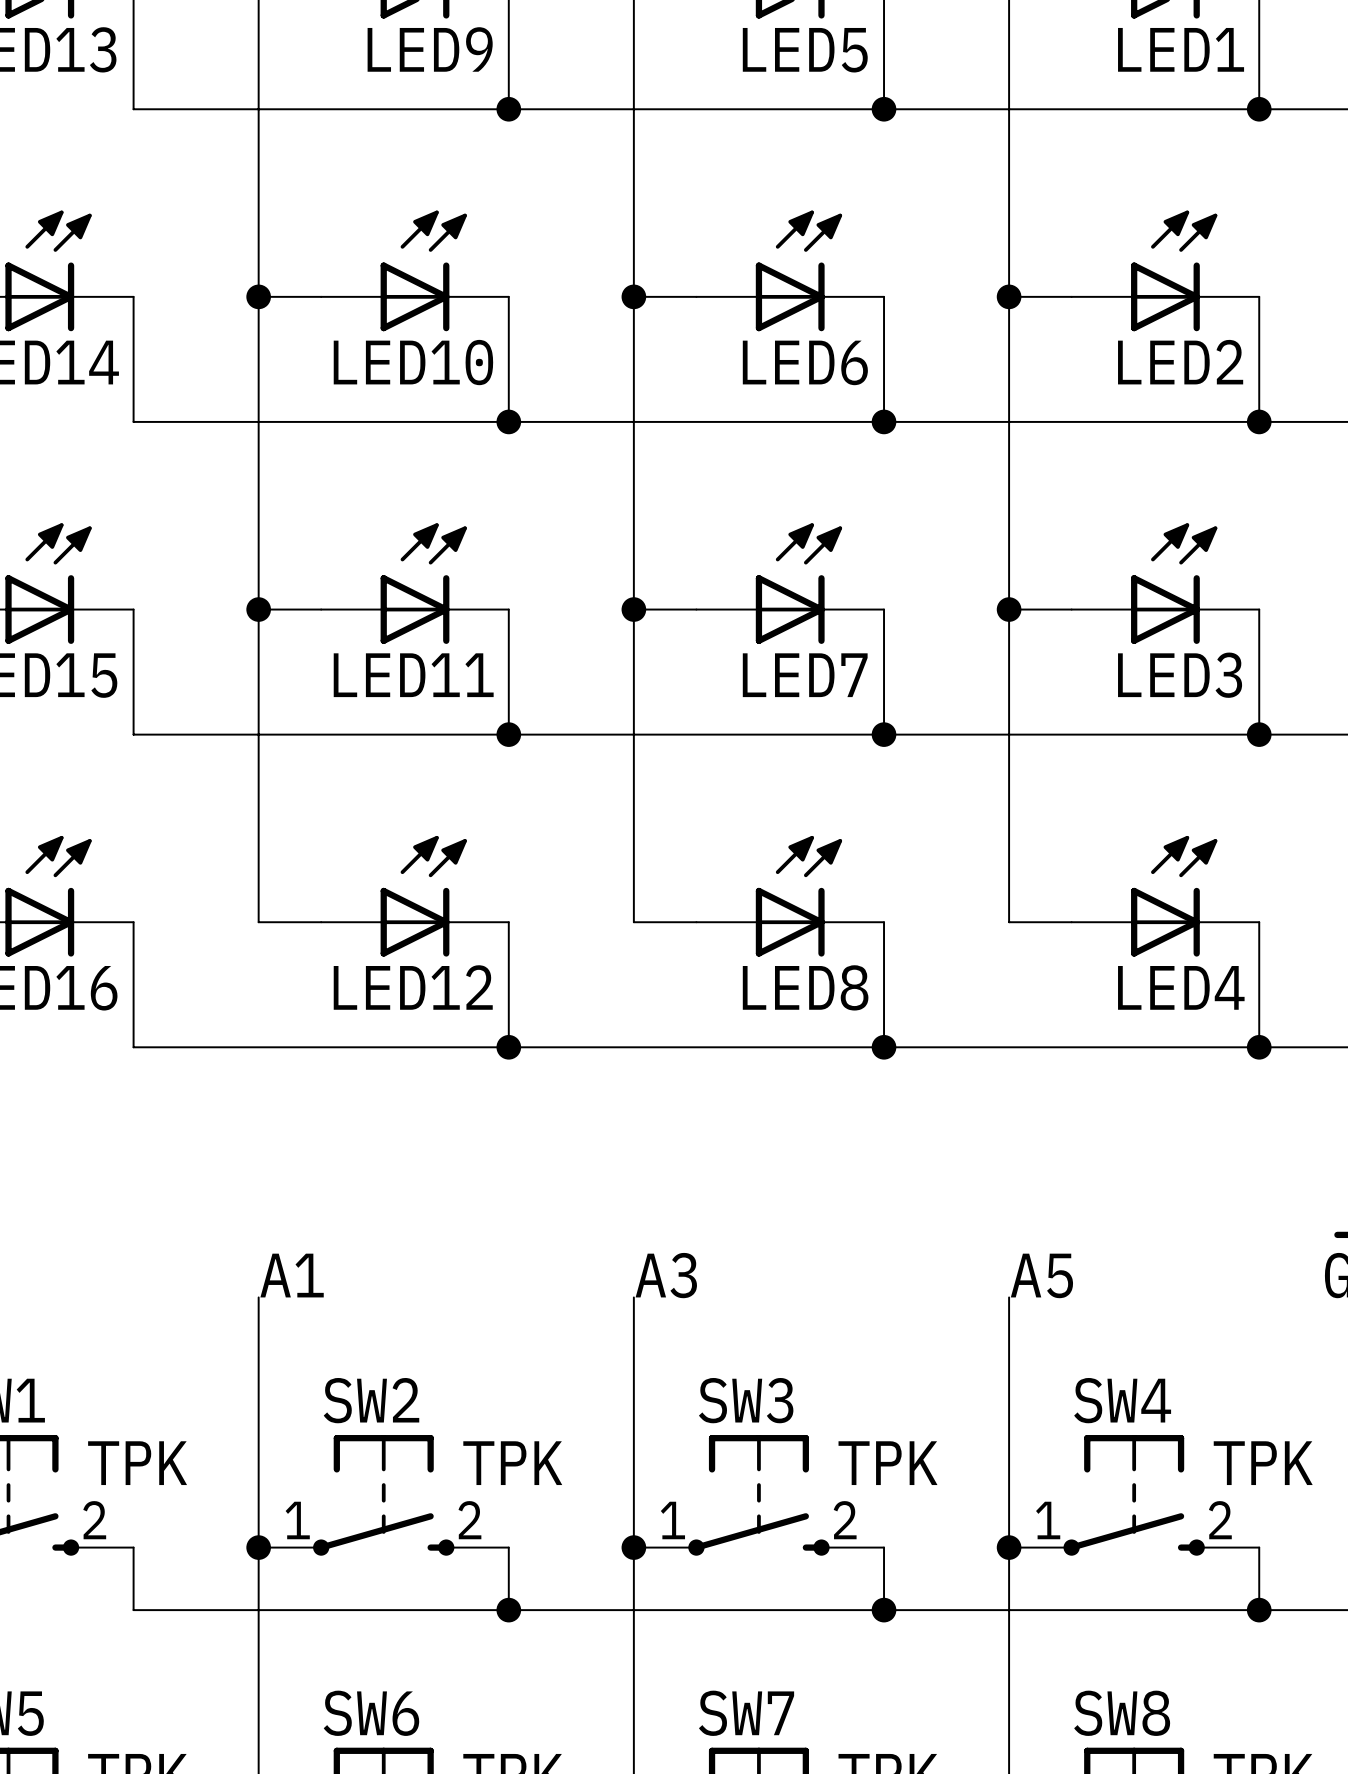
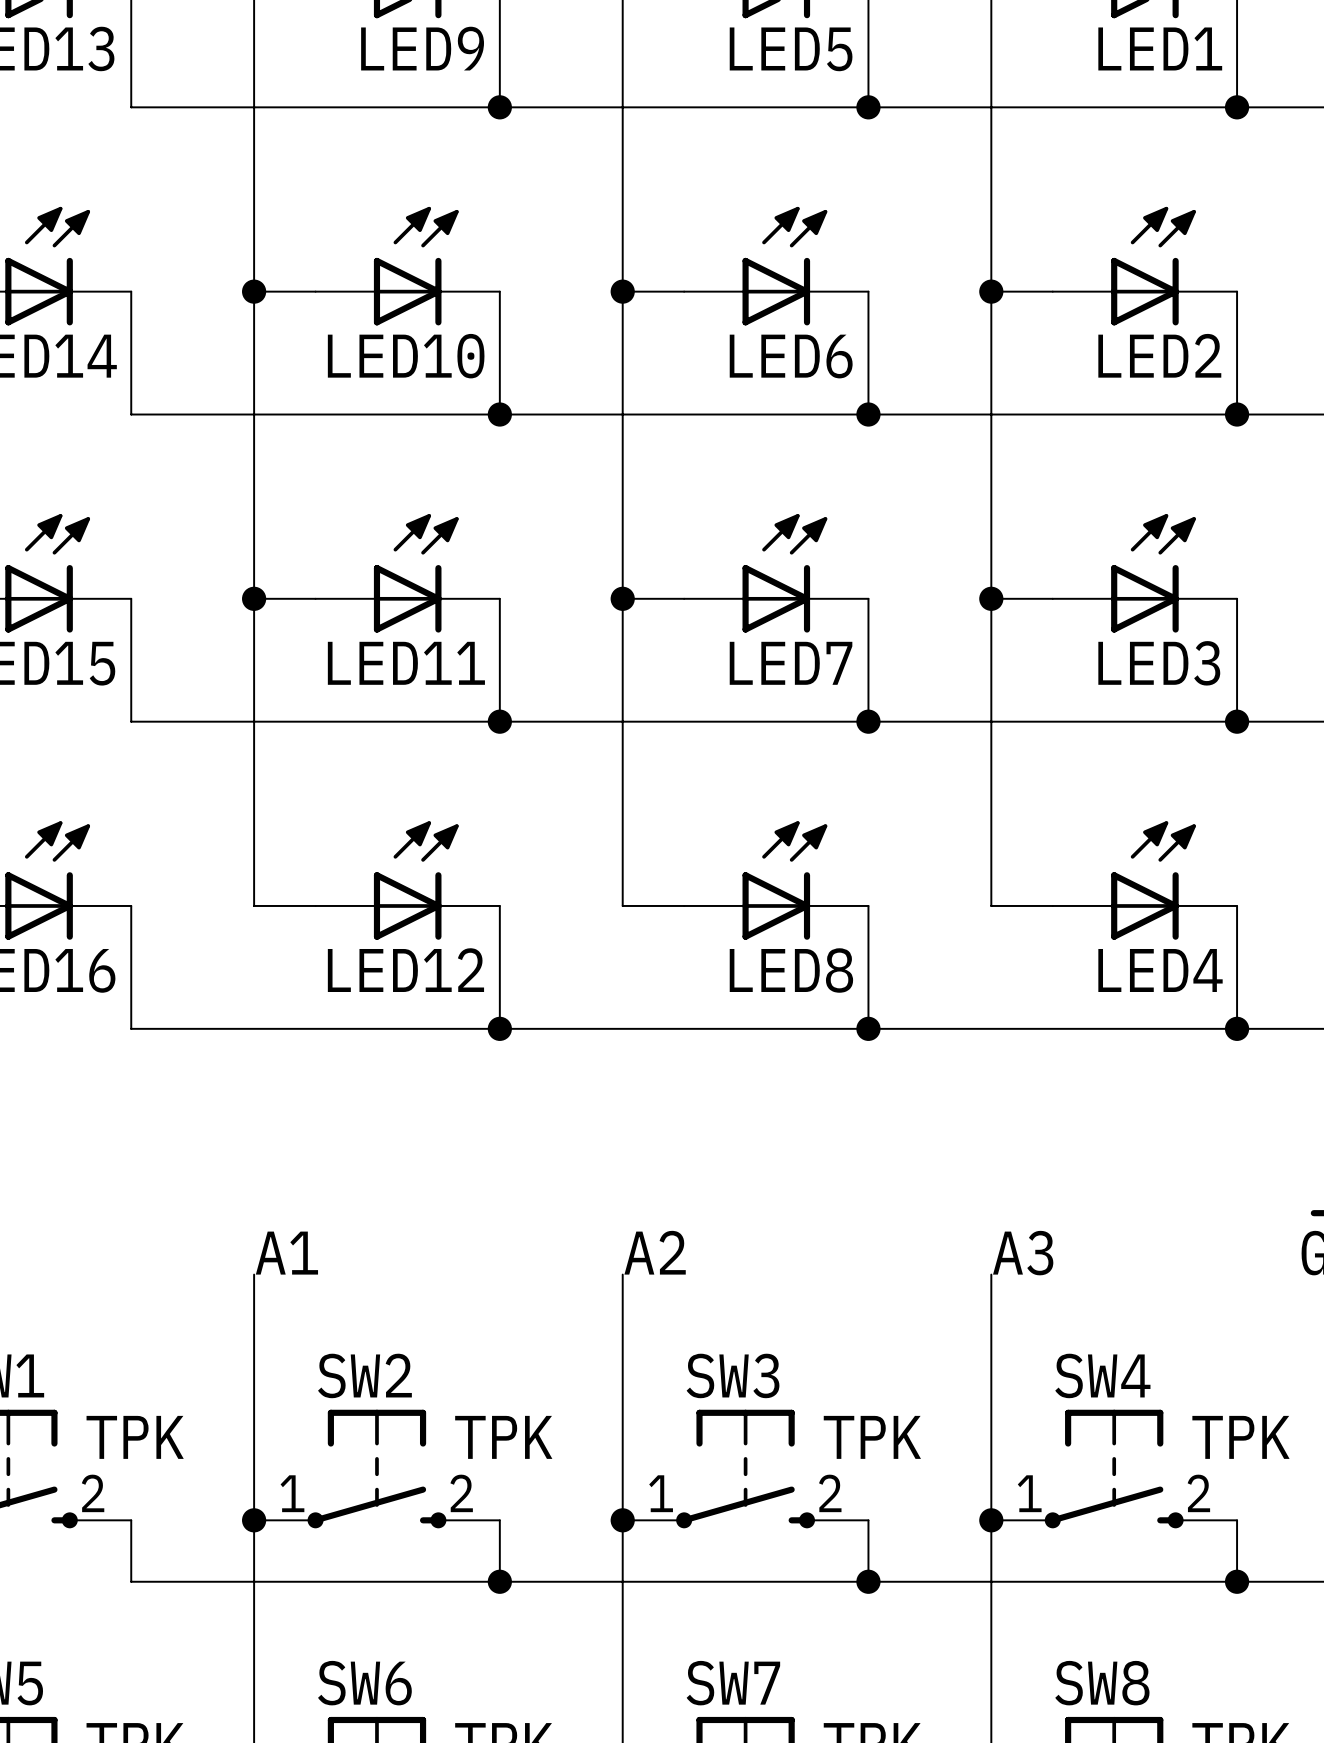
label: A3 (666, 1275) -> A2 (655, 1252)
label: A5 (1041, 1275) -> A3 (1023, 1253)

